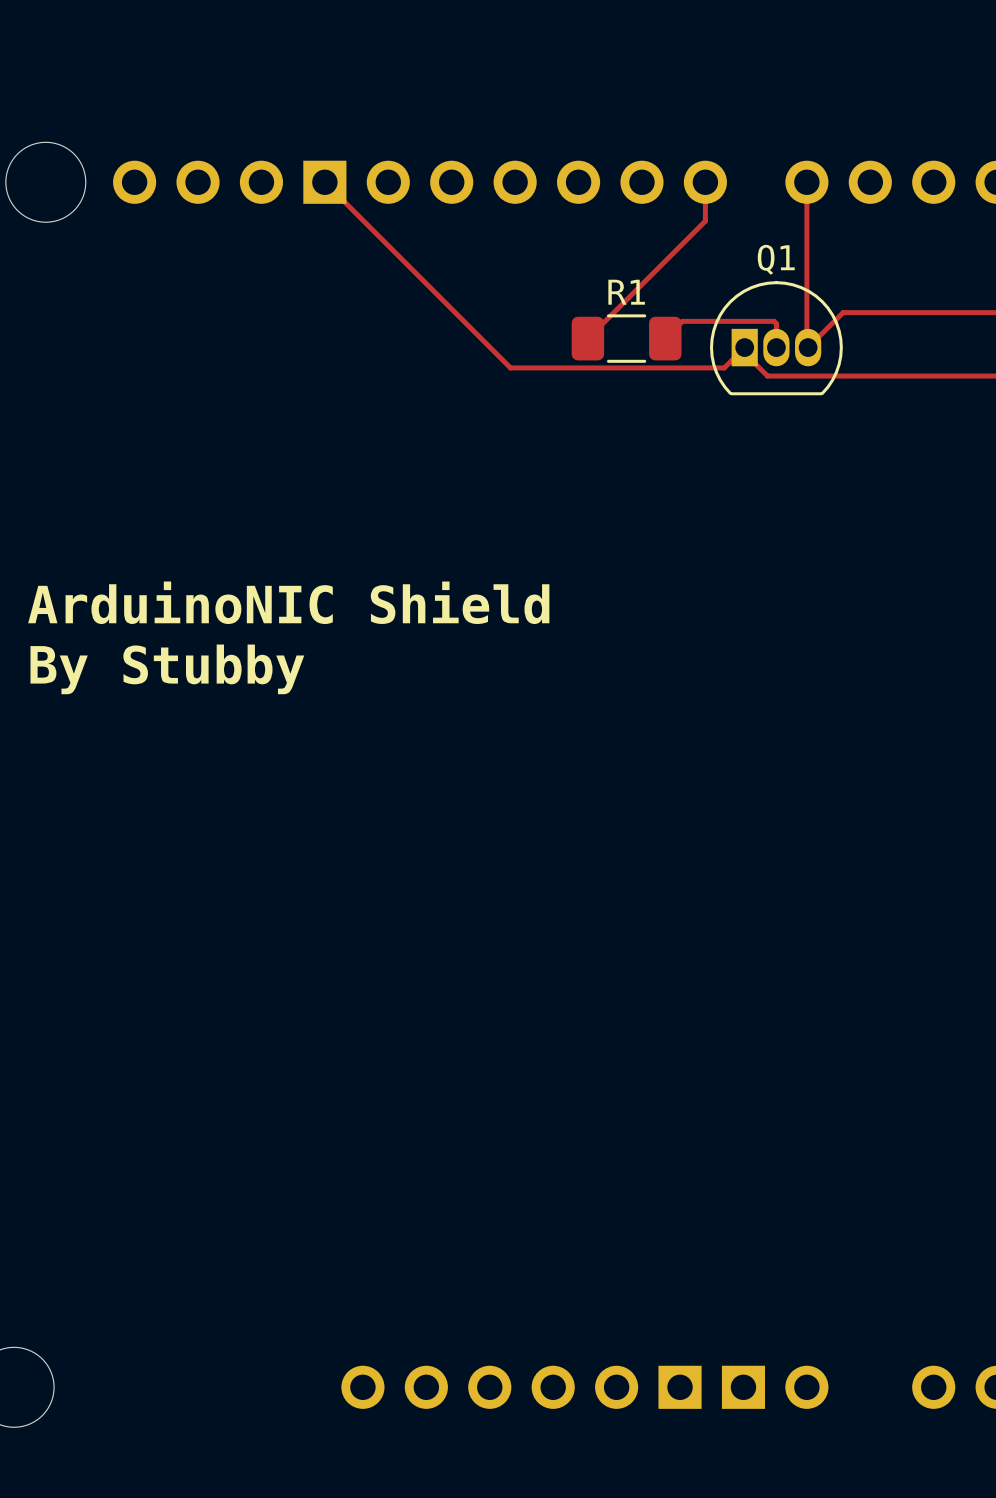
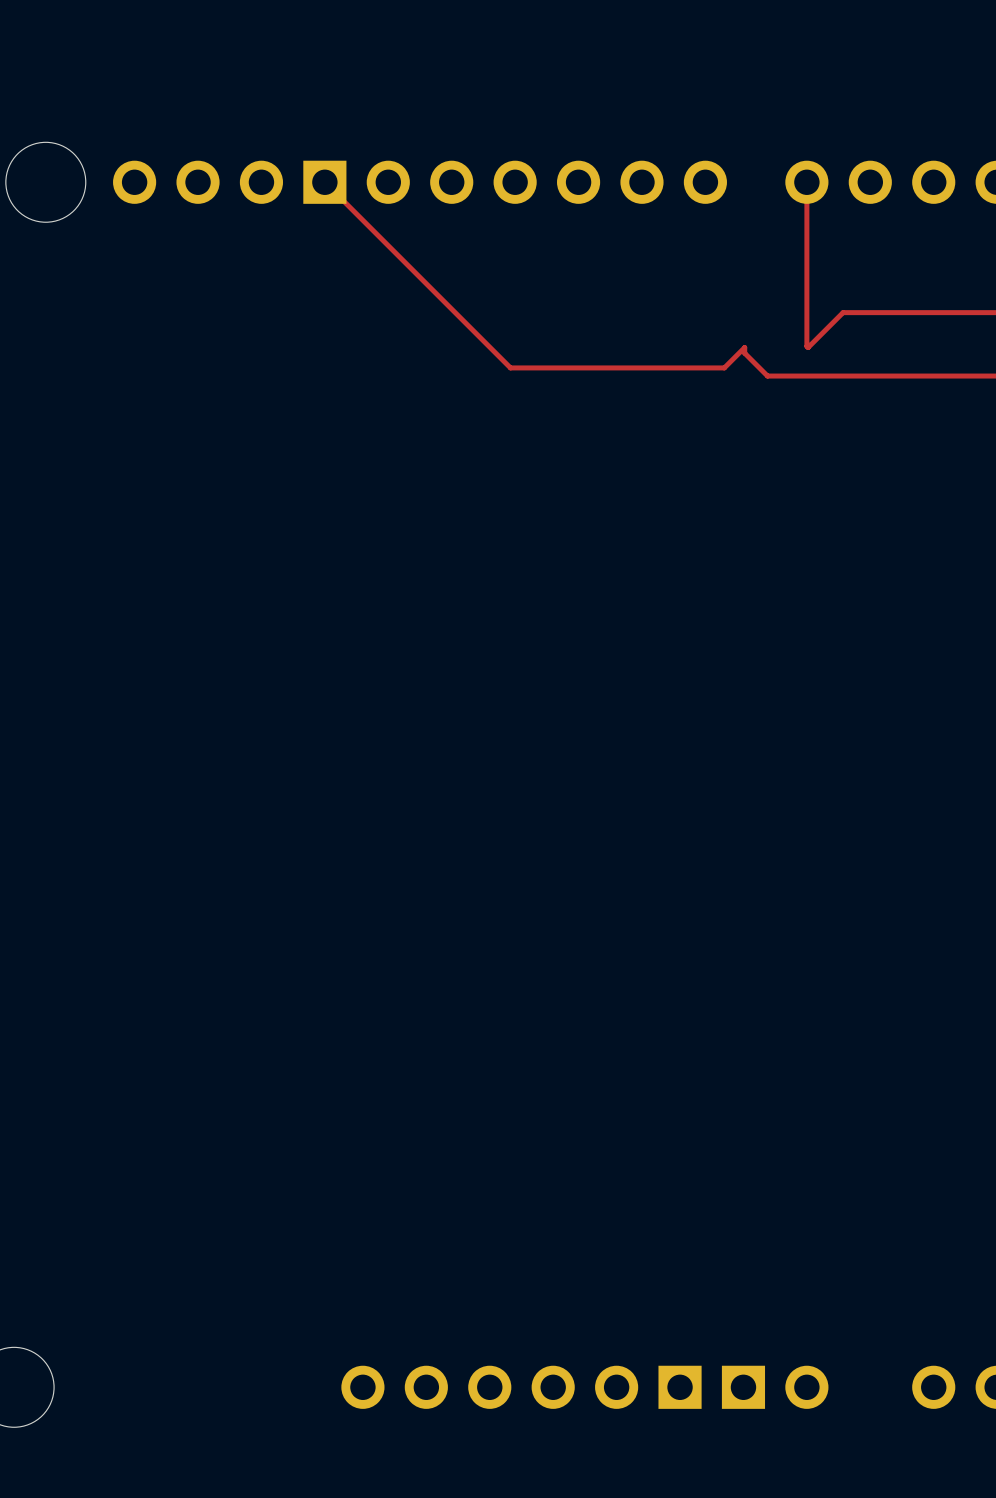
top track: (705, 182) (705, 221) (587, 338) -> none
R1: (626, 338) -> none
top track: (665, 338) (682, 321) (773, 321) (776, 323) (776, 347) -> none
Q1: (776, 338) -> none
text: ArduinoNIC Shield (288, 602) -> none
text: By Stubby (167, 669) -> none

